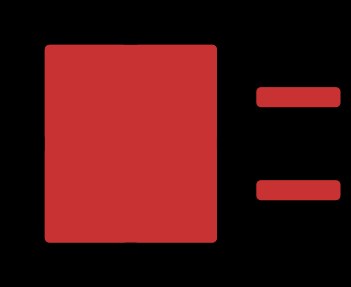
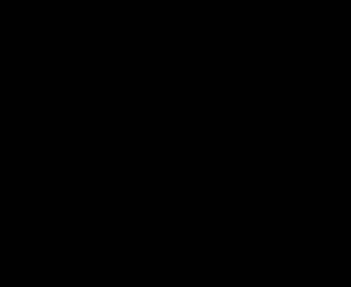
part: (192, 143) -> none

